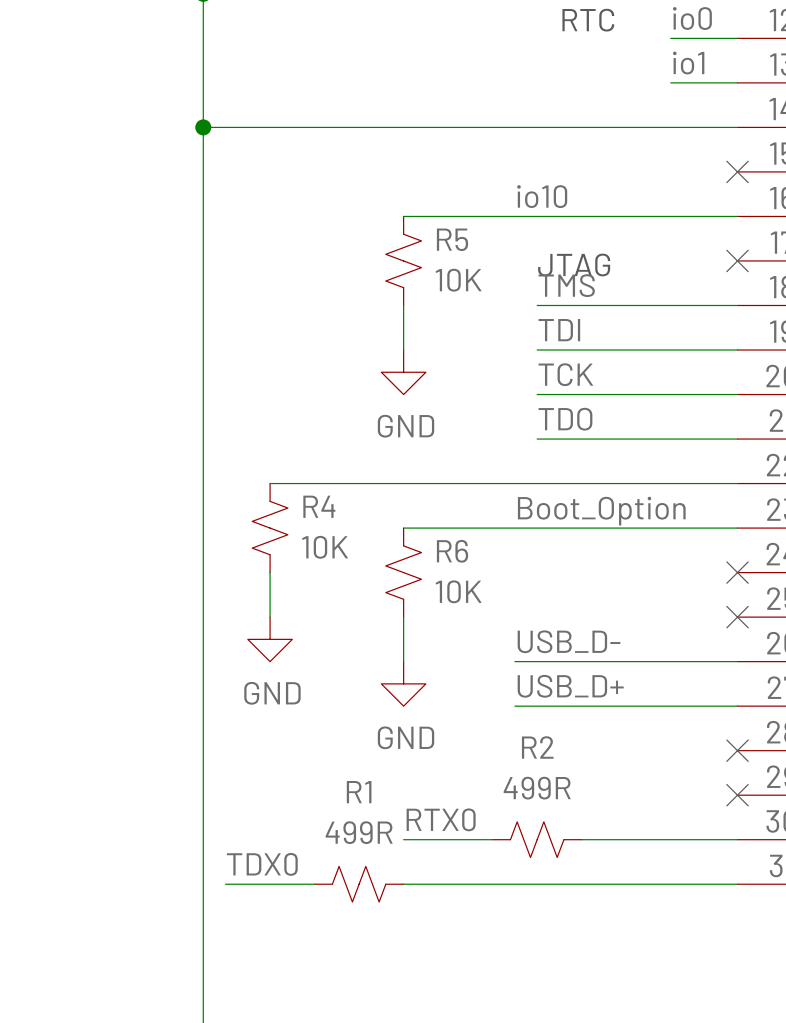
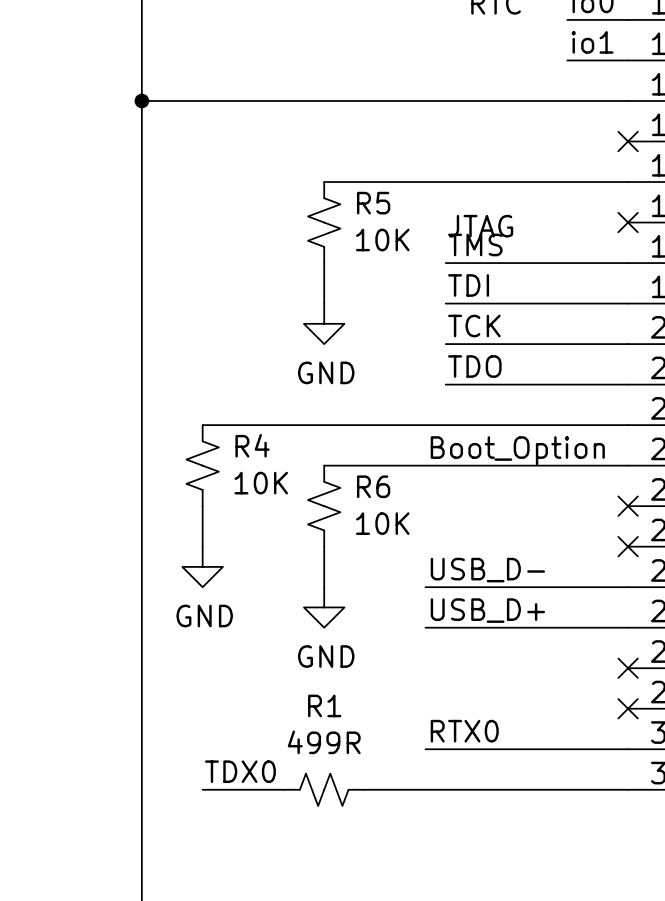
label: io10 (542, 196) -> none
label position: RTX0 (441, 819) -> RTX0 (464, 731)
wire: (403, 839) (492, 839) -> none
wire: none -> (425, 749) (486, 749)
R2: 499R (537, 839) -> none
label position: TDX0 (262, 864) -> TDX0 (240, 771)
wire: (225, 884) (270, 884) -> none
R1 position: (359, 884) -> (324, 789)
wire: (403, 884) (448, 884) -> (243, 789) (283, 789)

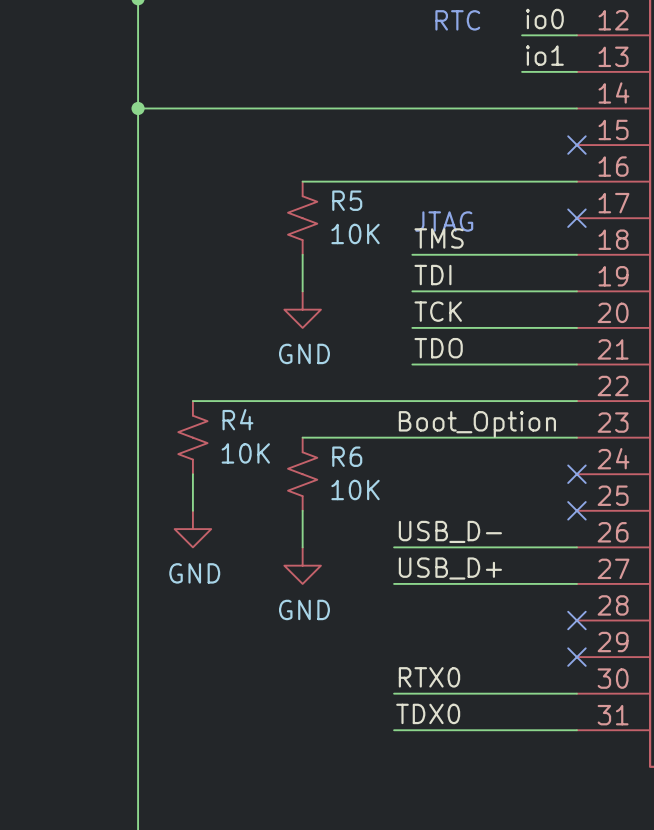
label position: TDX0 (240, 771) -> TDX0 (428, 713)
wire: (202, 789) (283, 789) -> none
R1: 499R (324, 789) -> none
wire: (364, 789) (425, 789) -> none

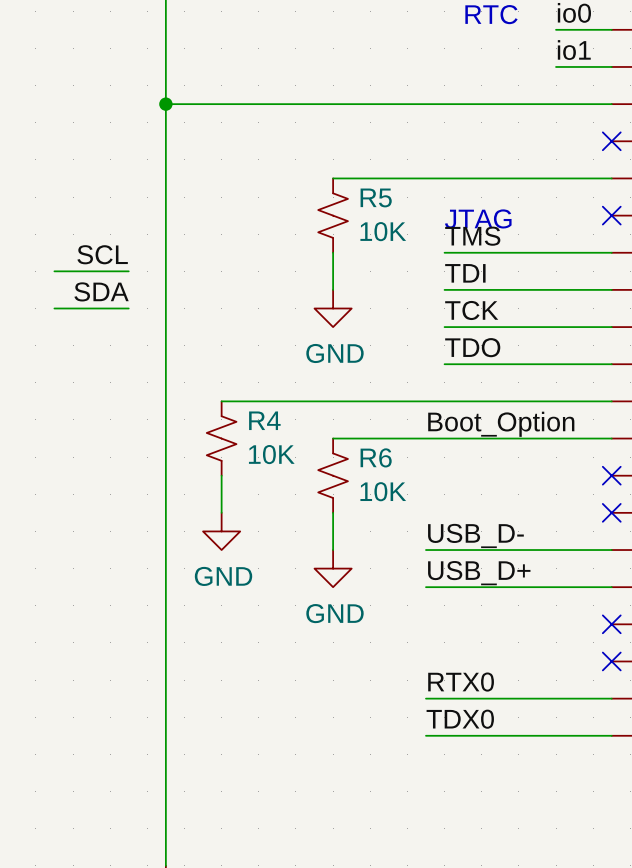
label: none -> SCL (102, 254)
wire: none -> (54, 271) (128, 271)
label: none -> SDA (101, 291)
wire: none -> (54, 308) (128, 308)

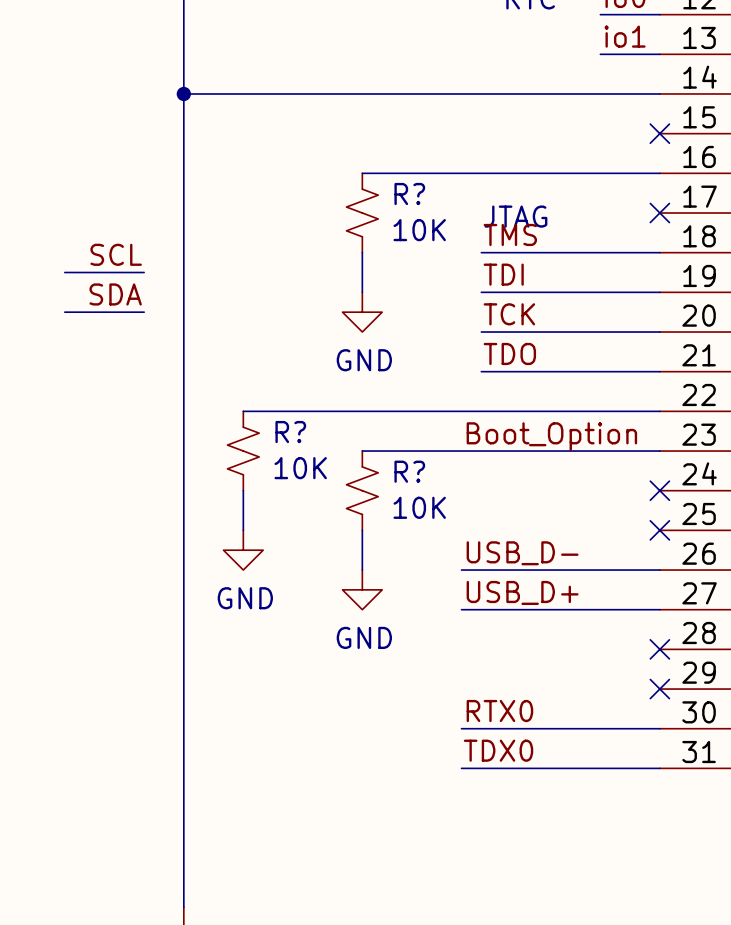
R5 name: R5 (376, 197) -> R? (409, 194)
R4 name: R4 (264, 420) -> R? (290, 432)
R6 name: R6 (376, 457) -> R? (409, 471)

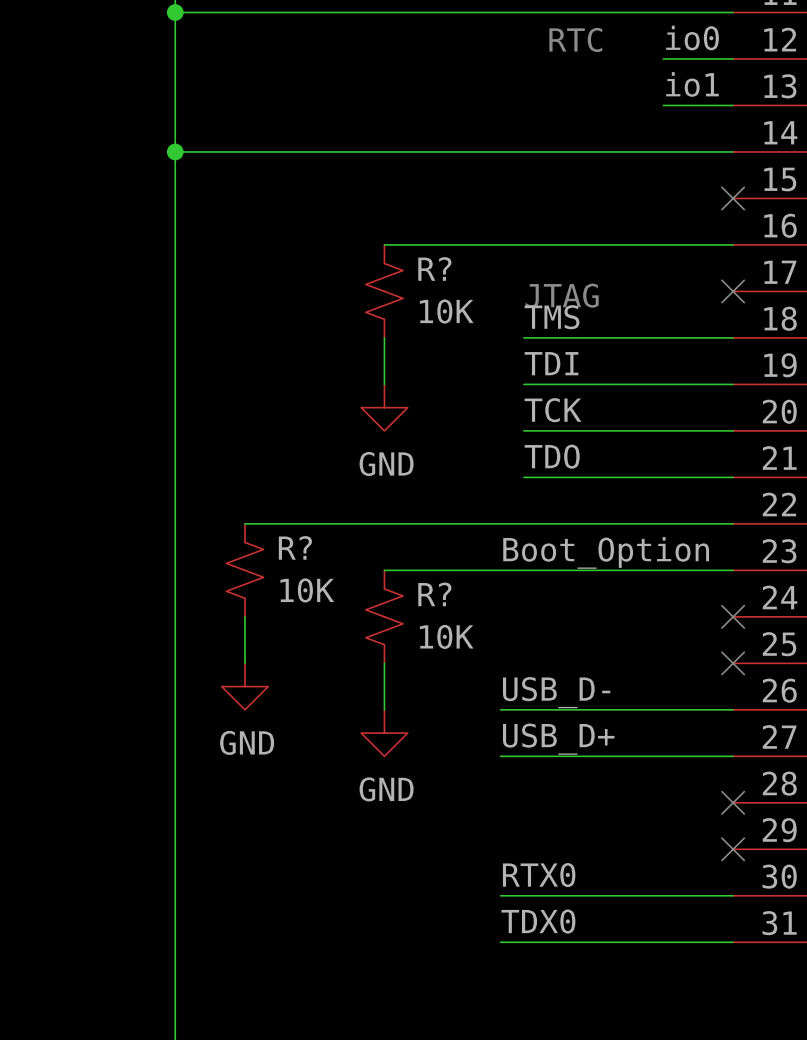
label: SCL (116, 254) -> none
wire: (64, 272) (144, 272) -> none
label: SDA (115, 294) -> none
wire: (64, 312) (144, 312) -> none

